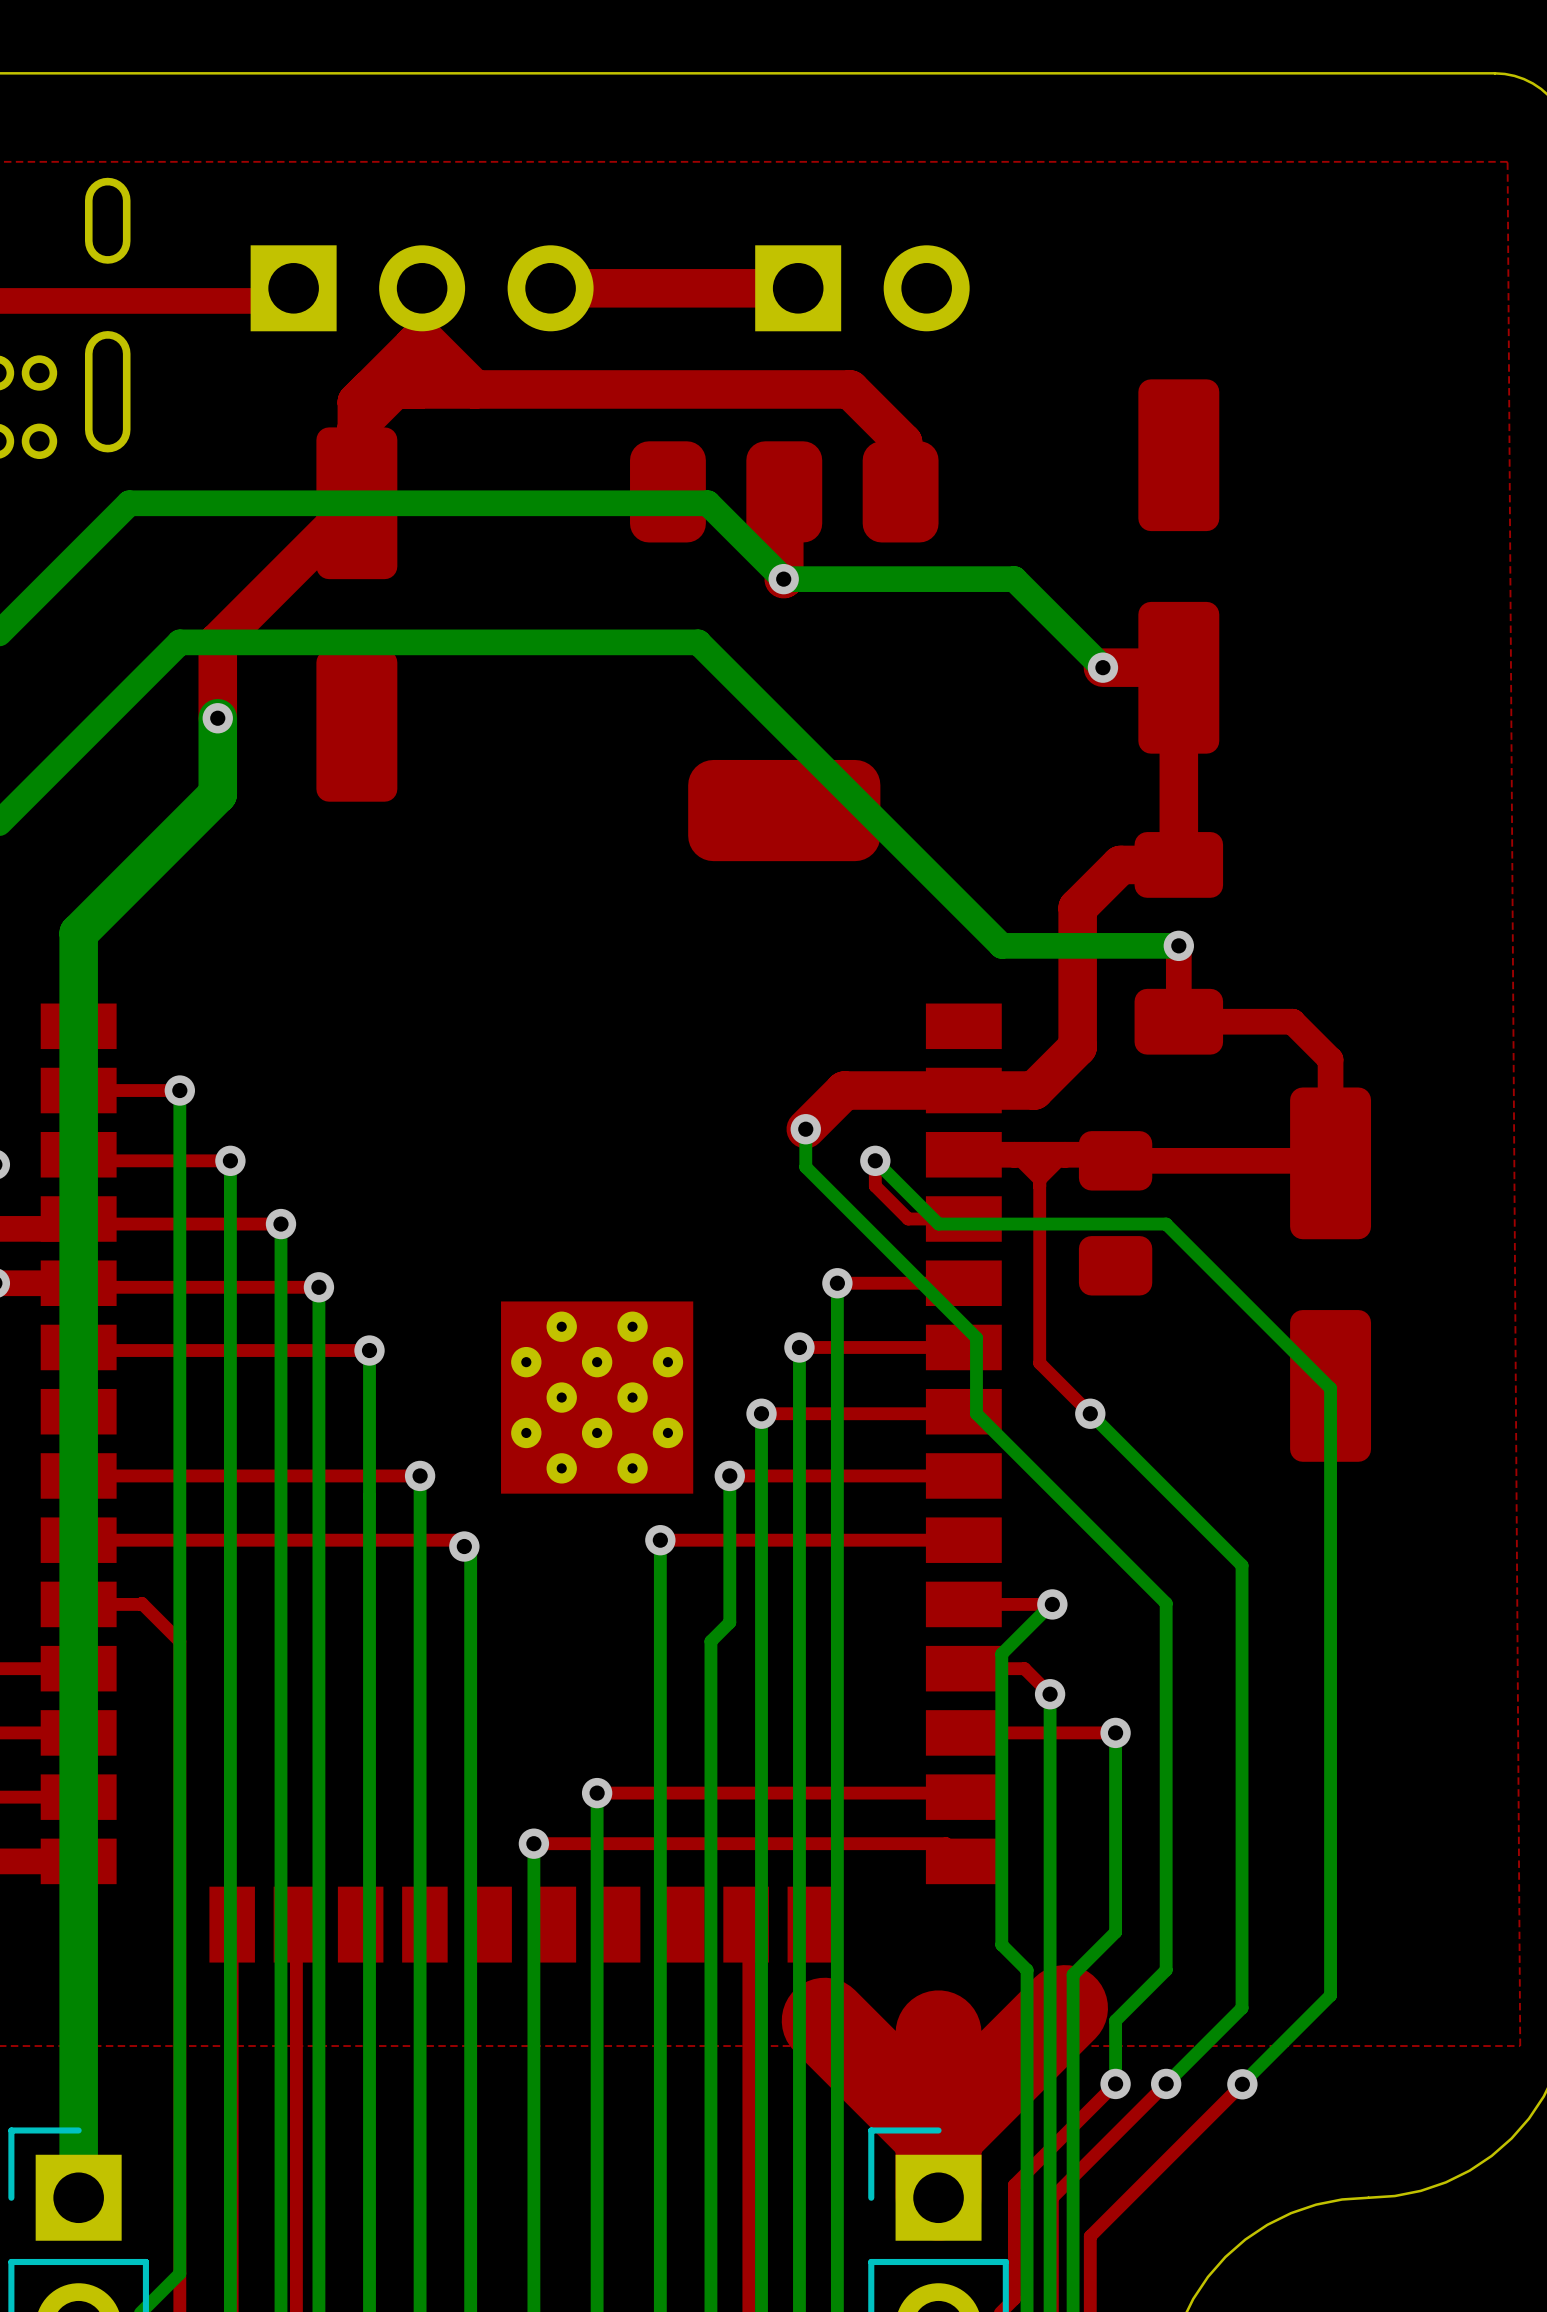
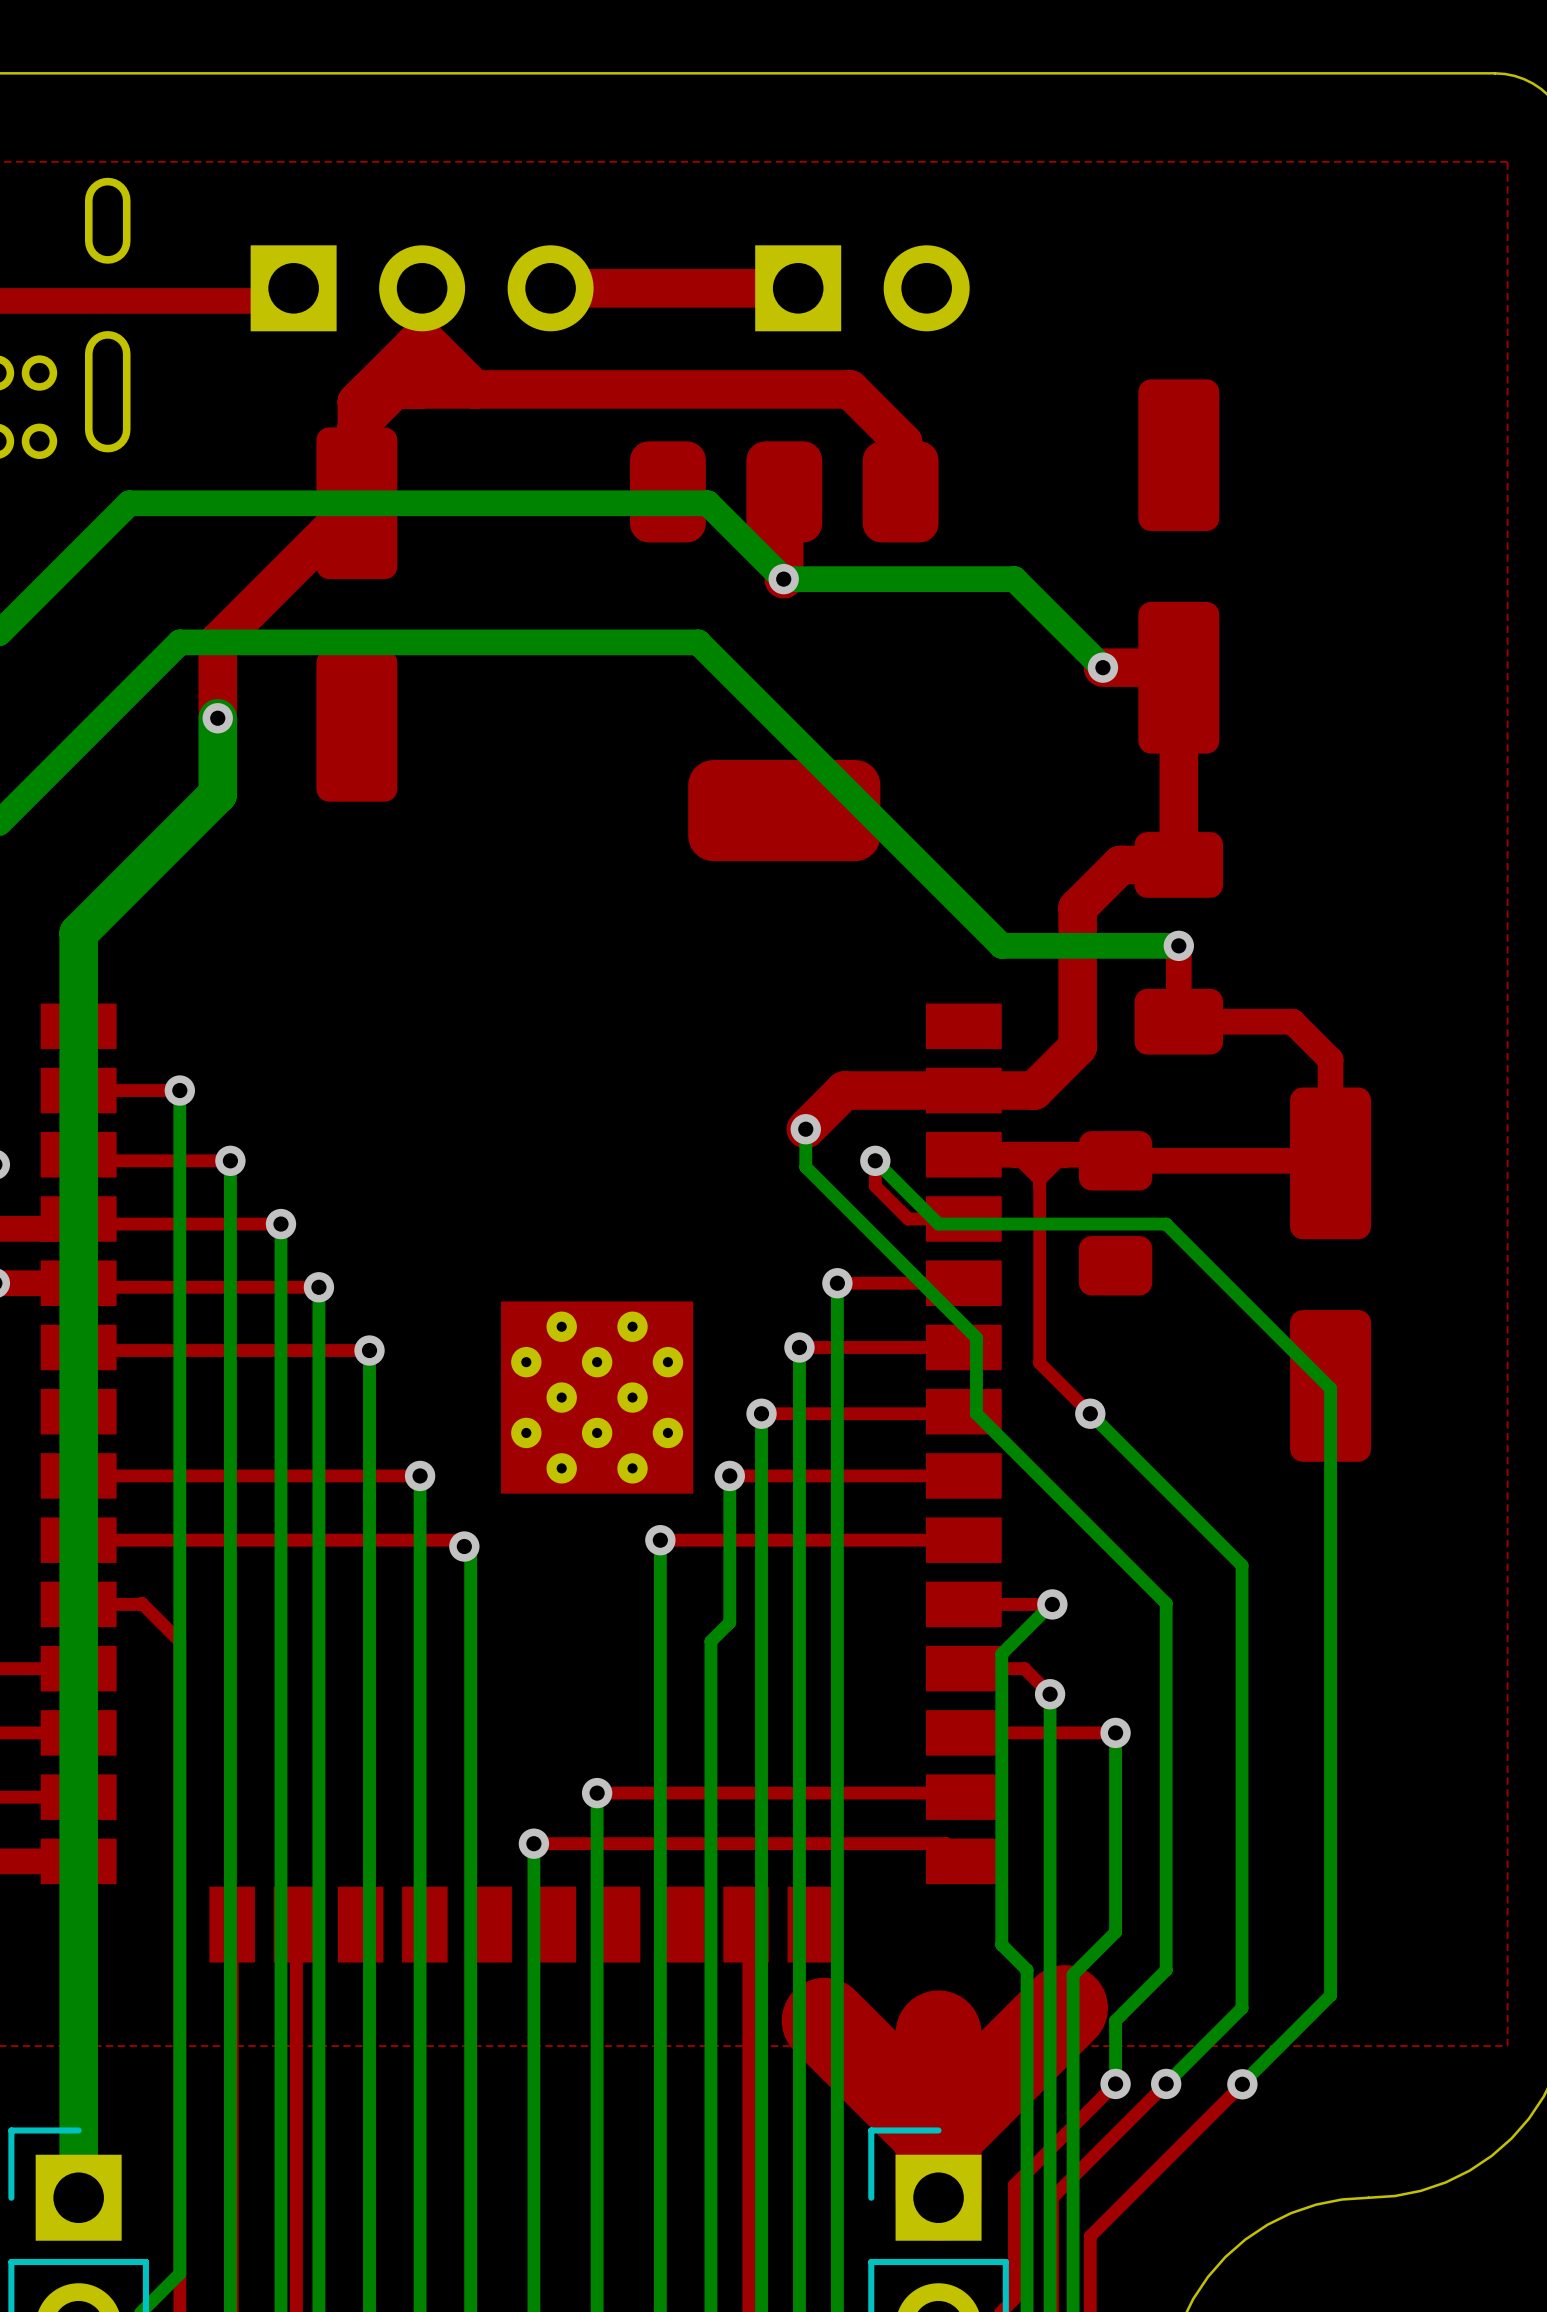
top zone outline: (1507, 161) (1520, 2046) (1507, 2046) -> (1507, 161) (1507, 2046)

